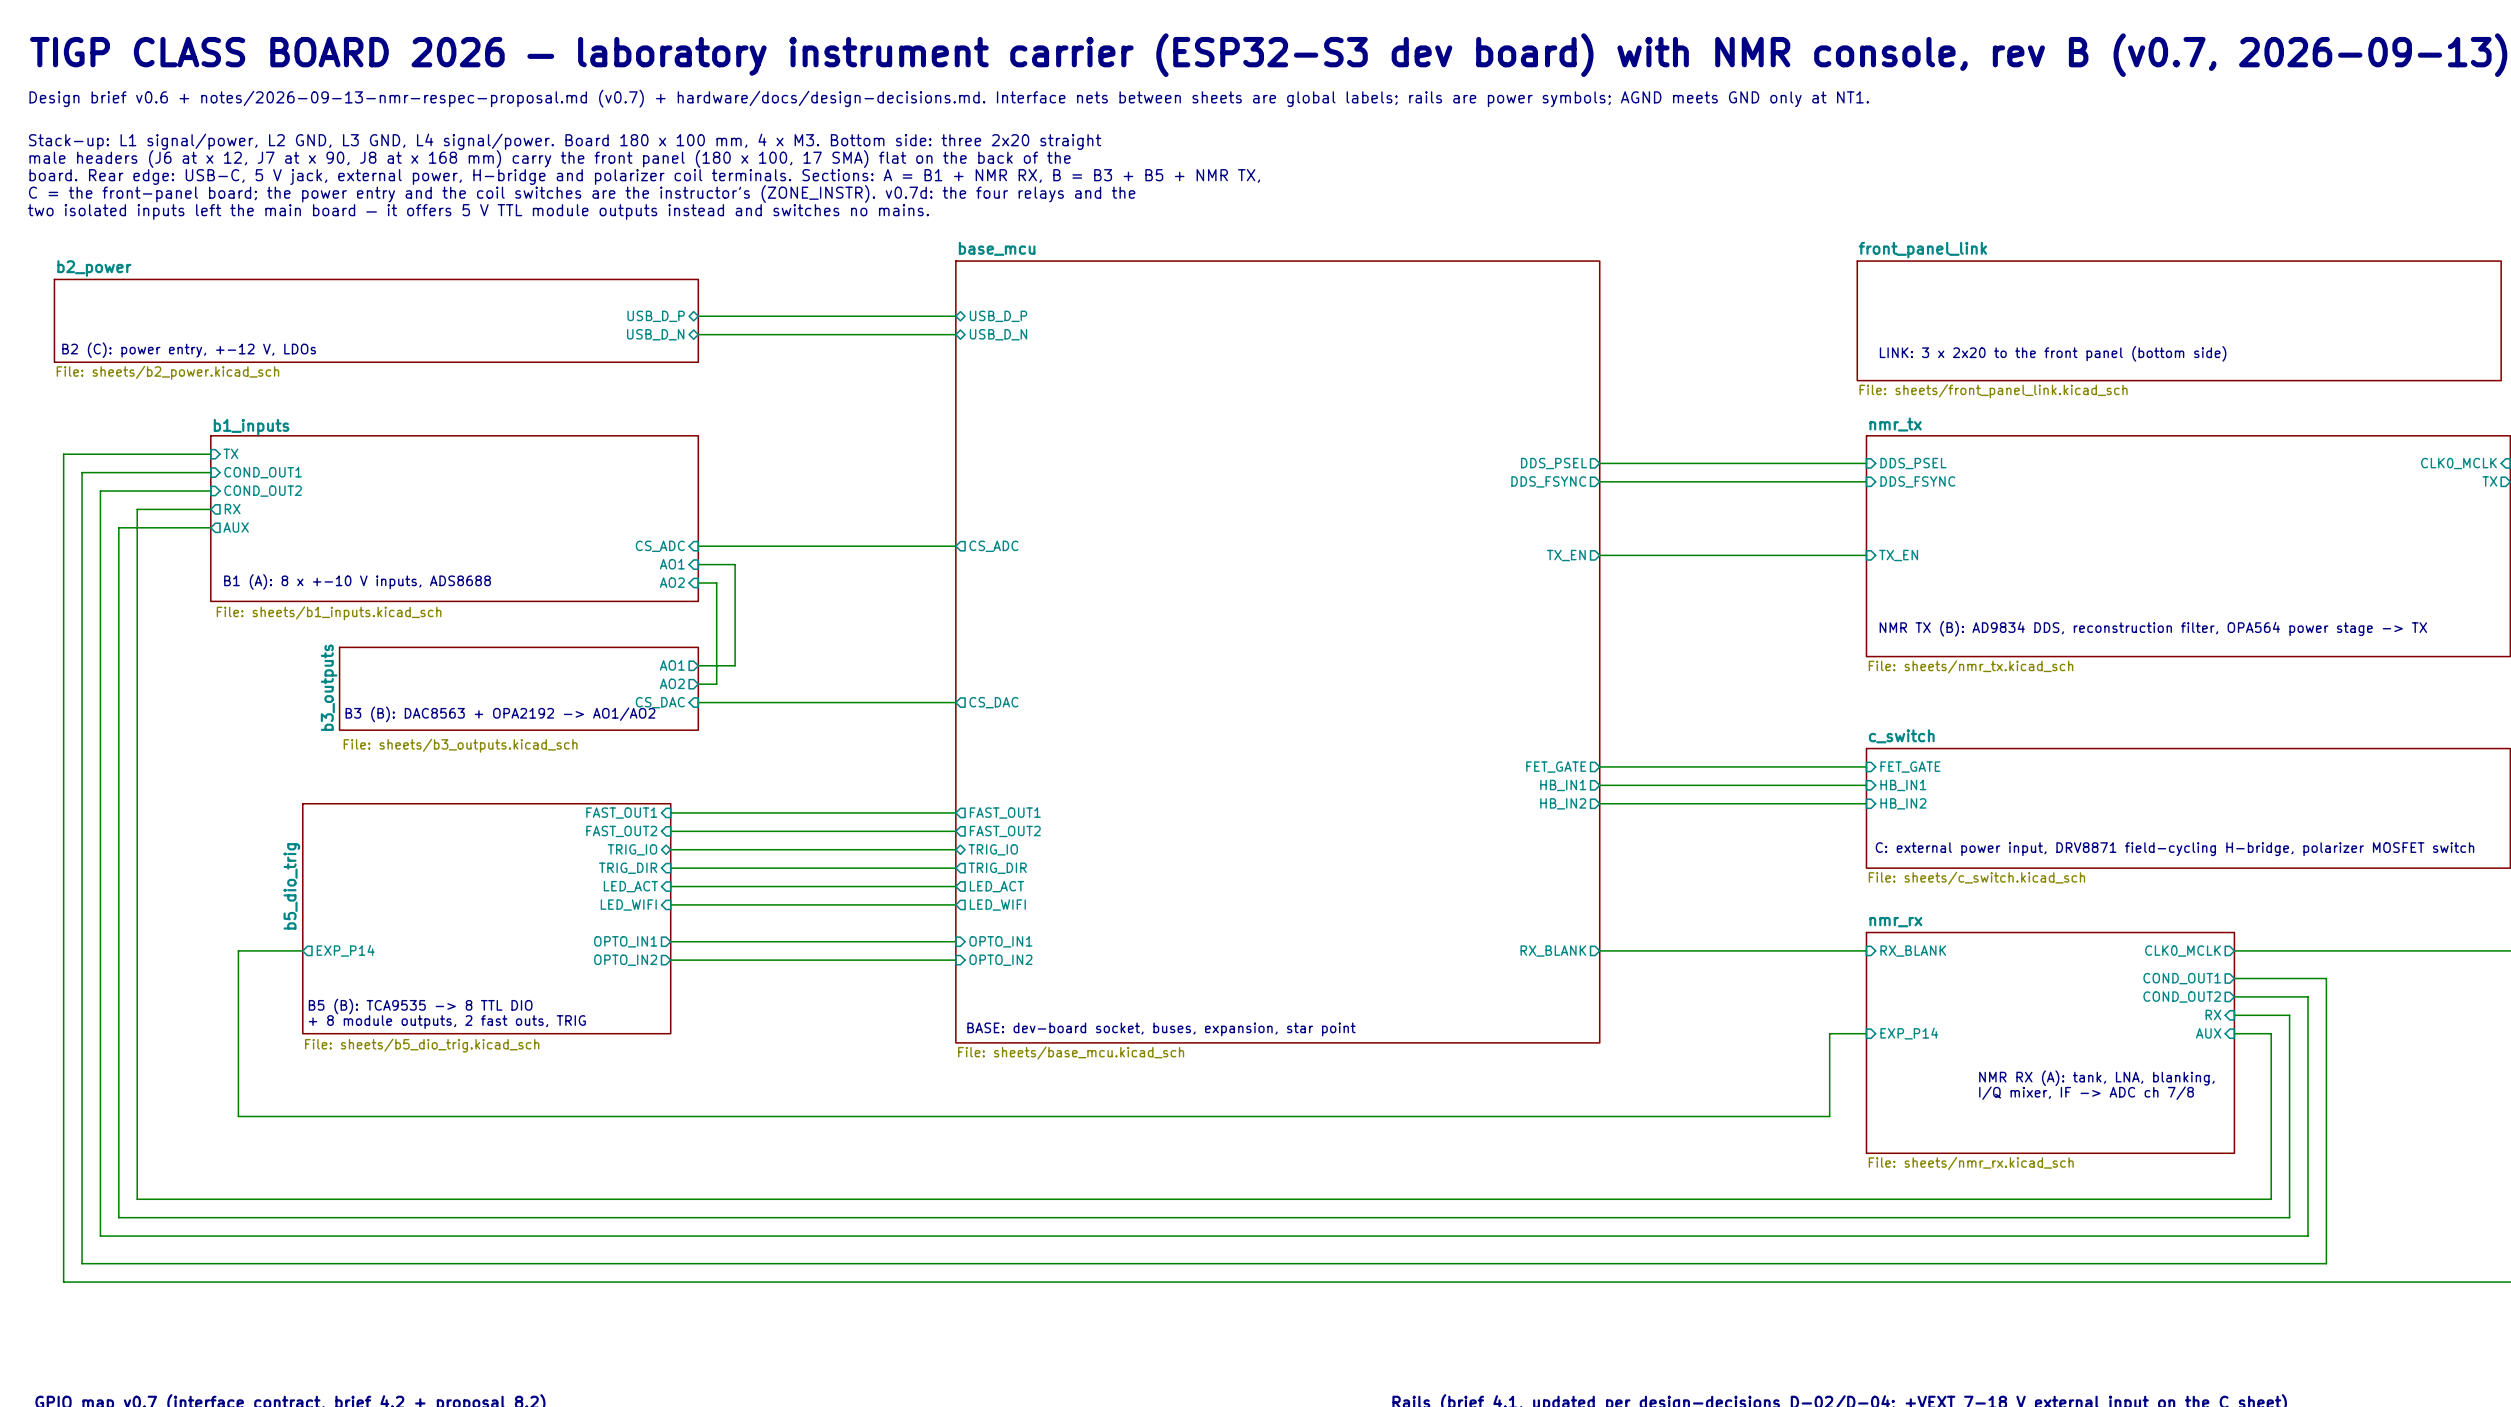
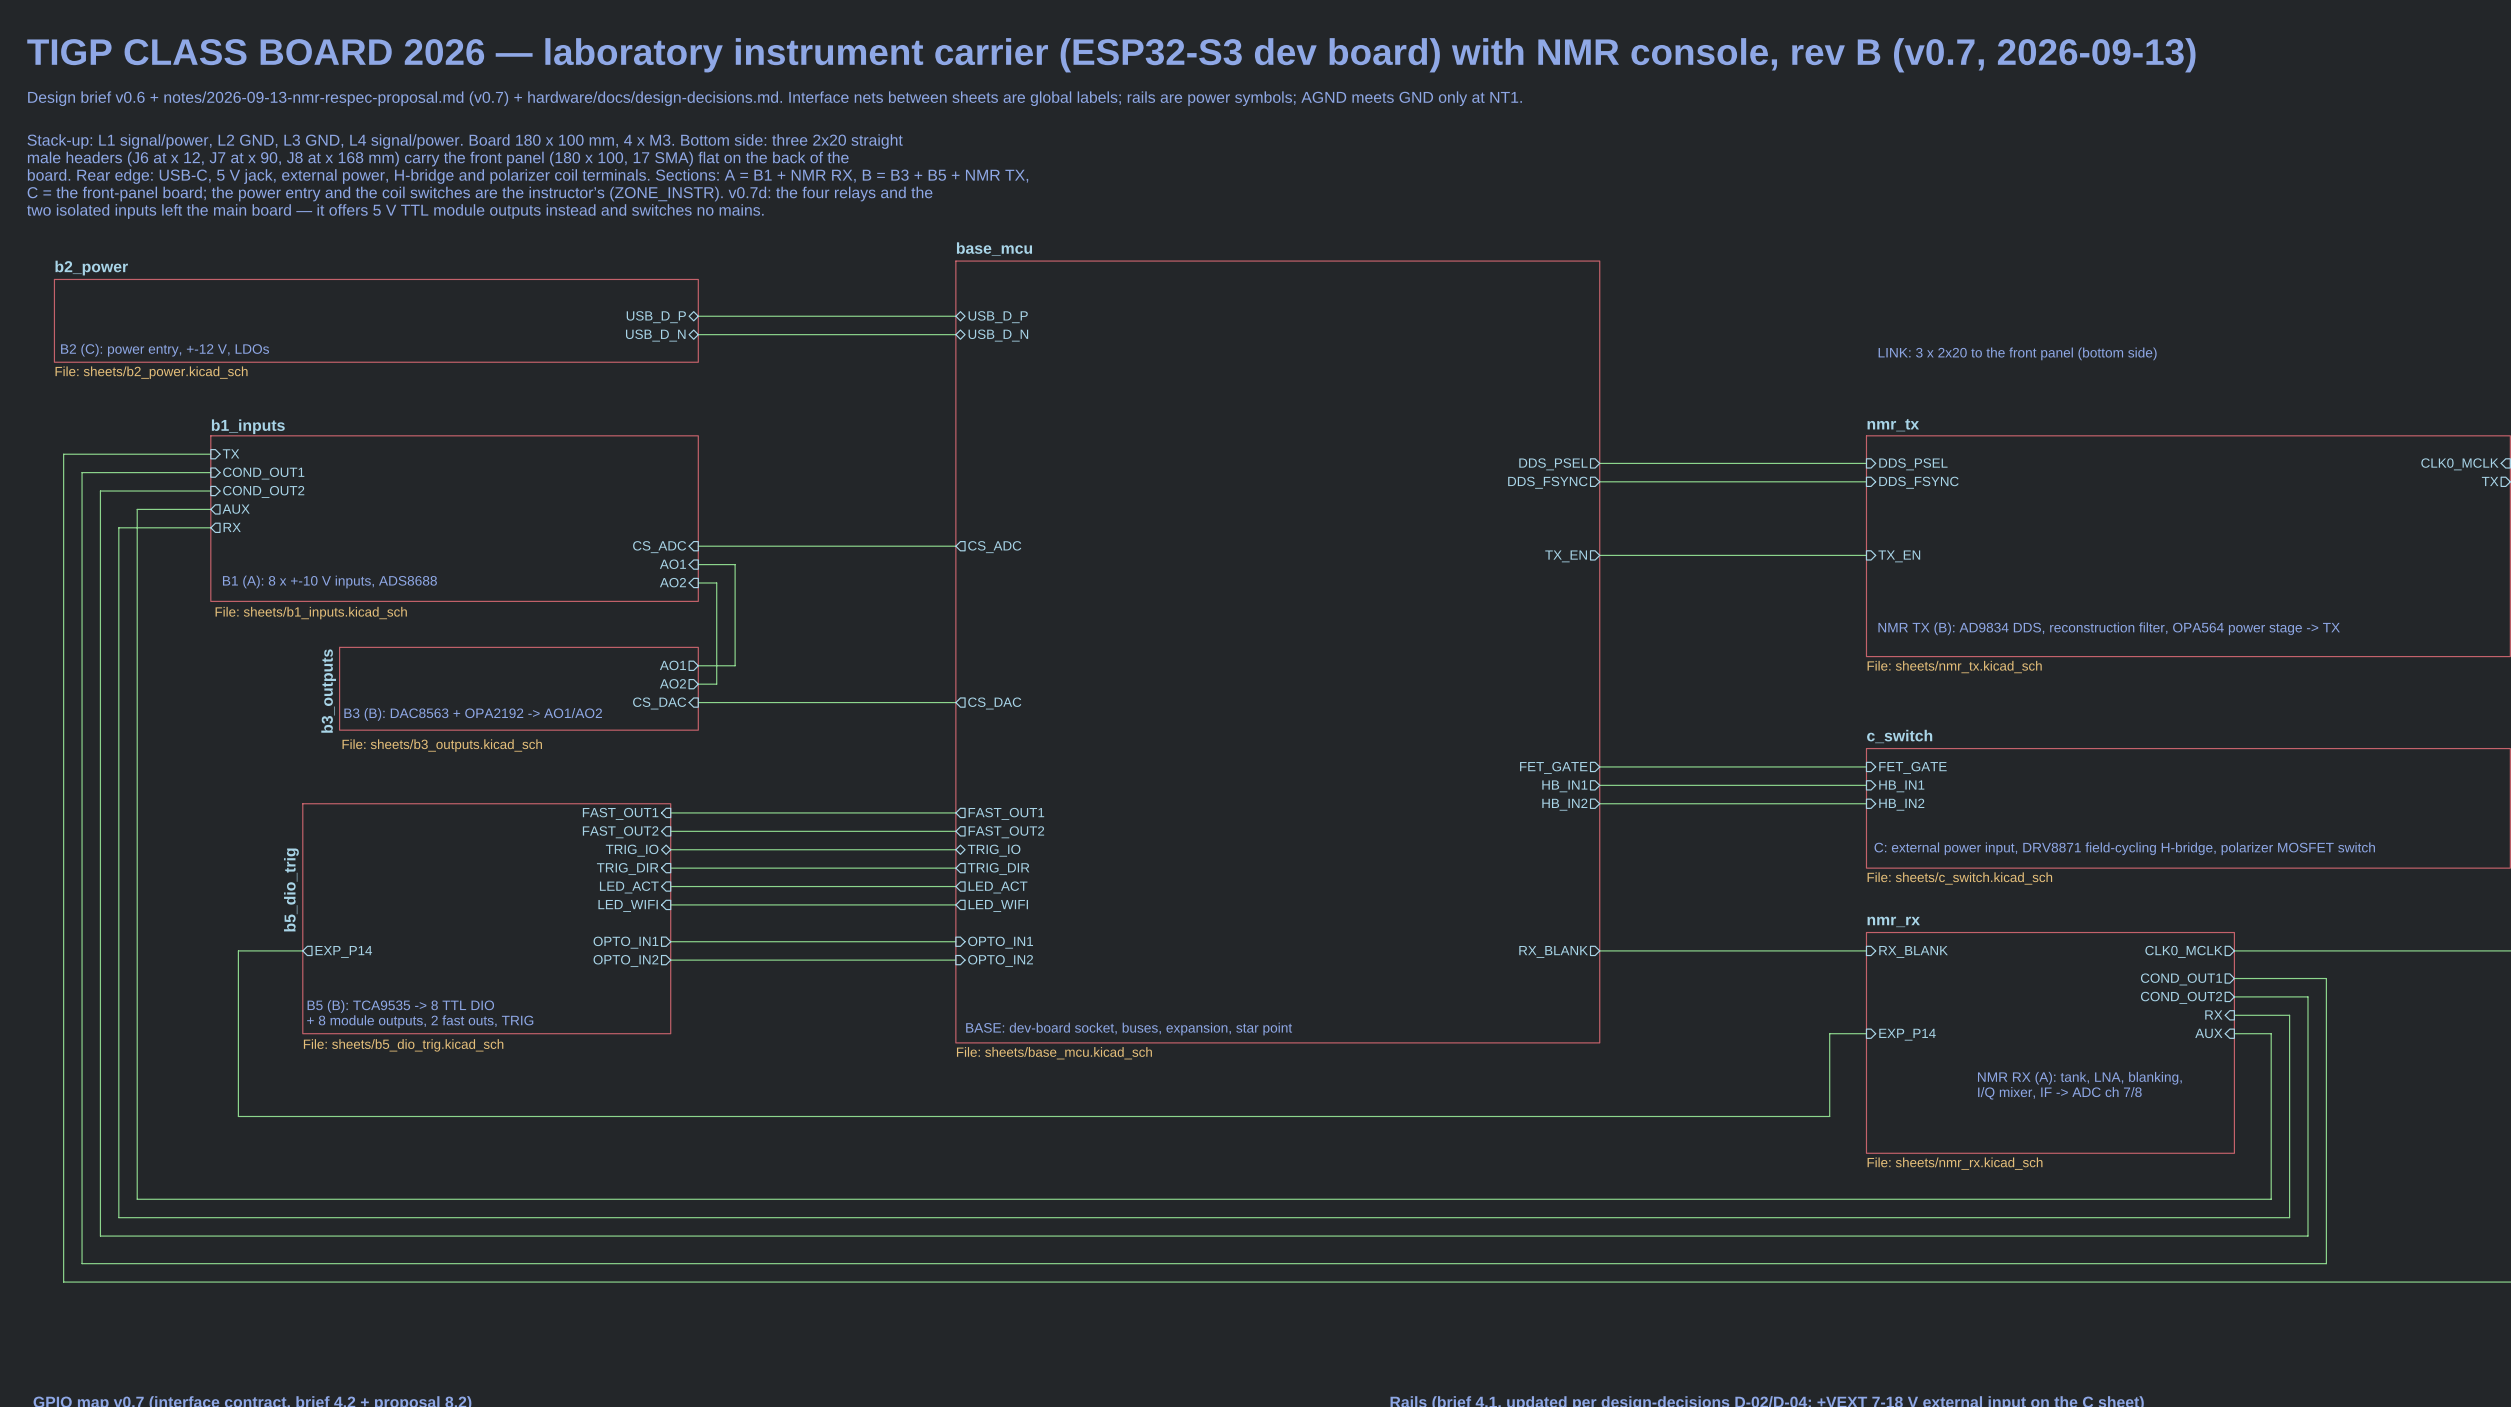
sheet front_panel_link: File: sheets/front_panel_link.kicad_sch (2179, 320) -> none
sheet pin: RX (232, 509) -> AUX (236, 509)
sheet pin: AUX (236, 527) -> RX (232, 527)

